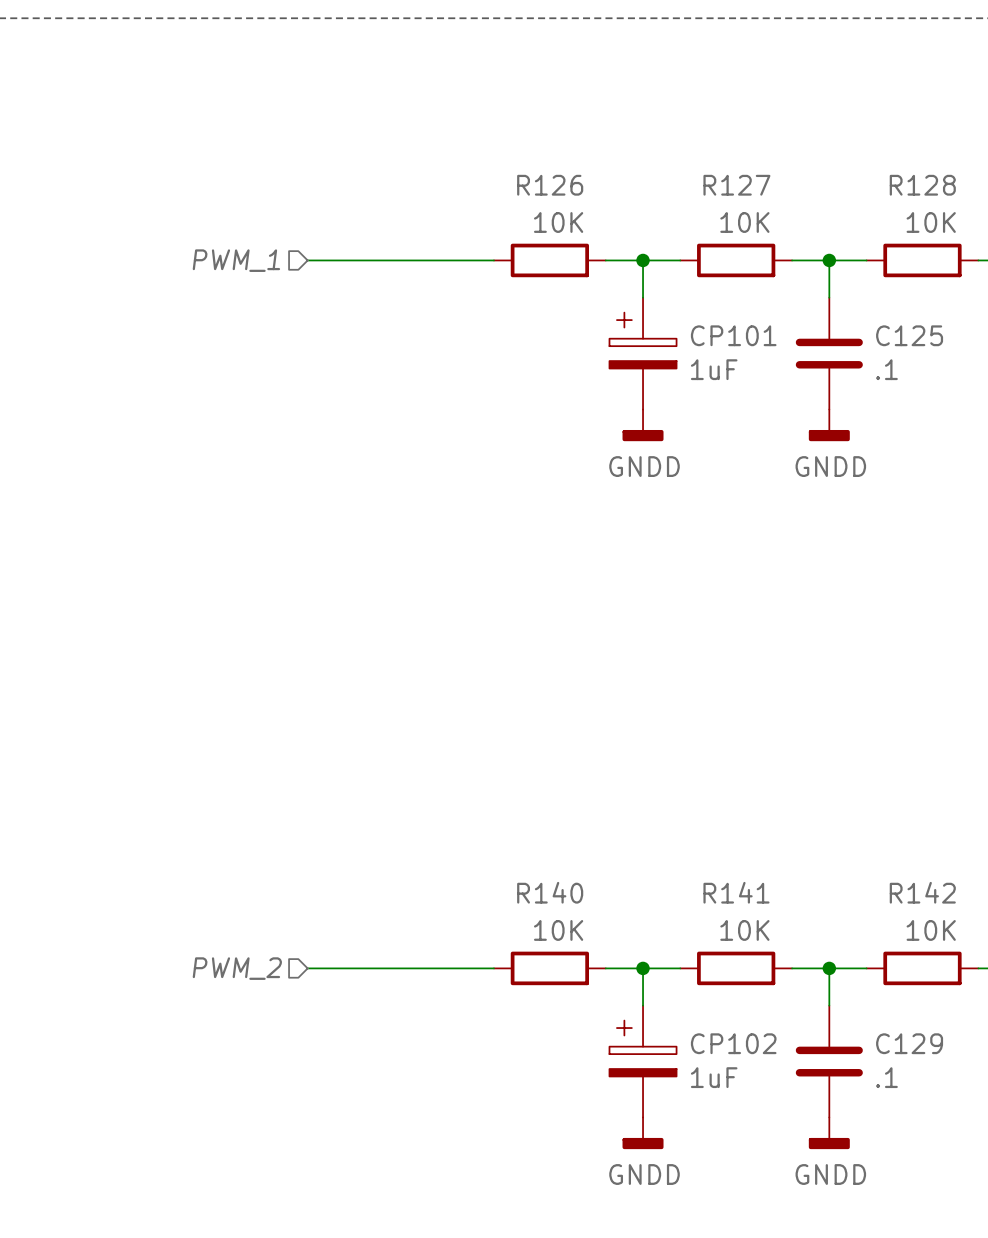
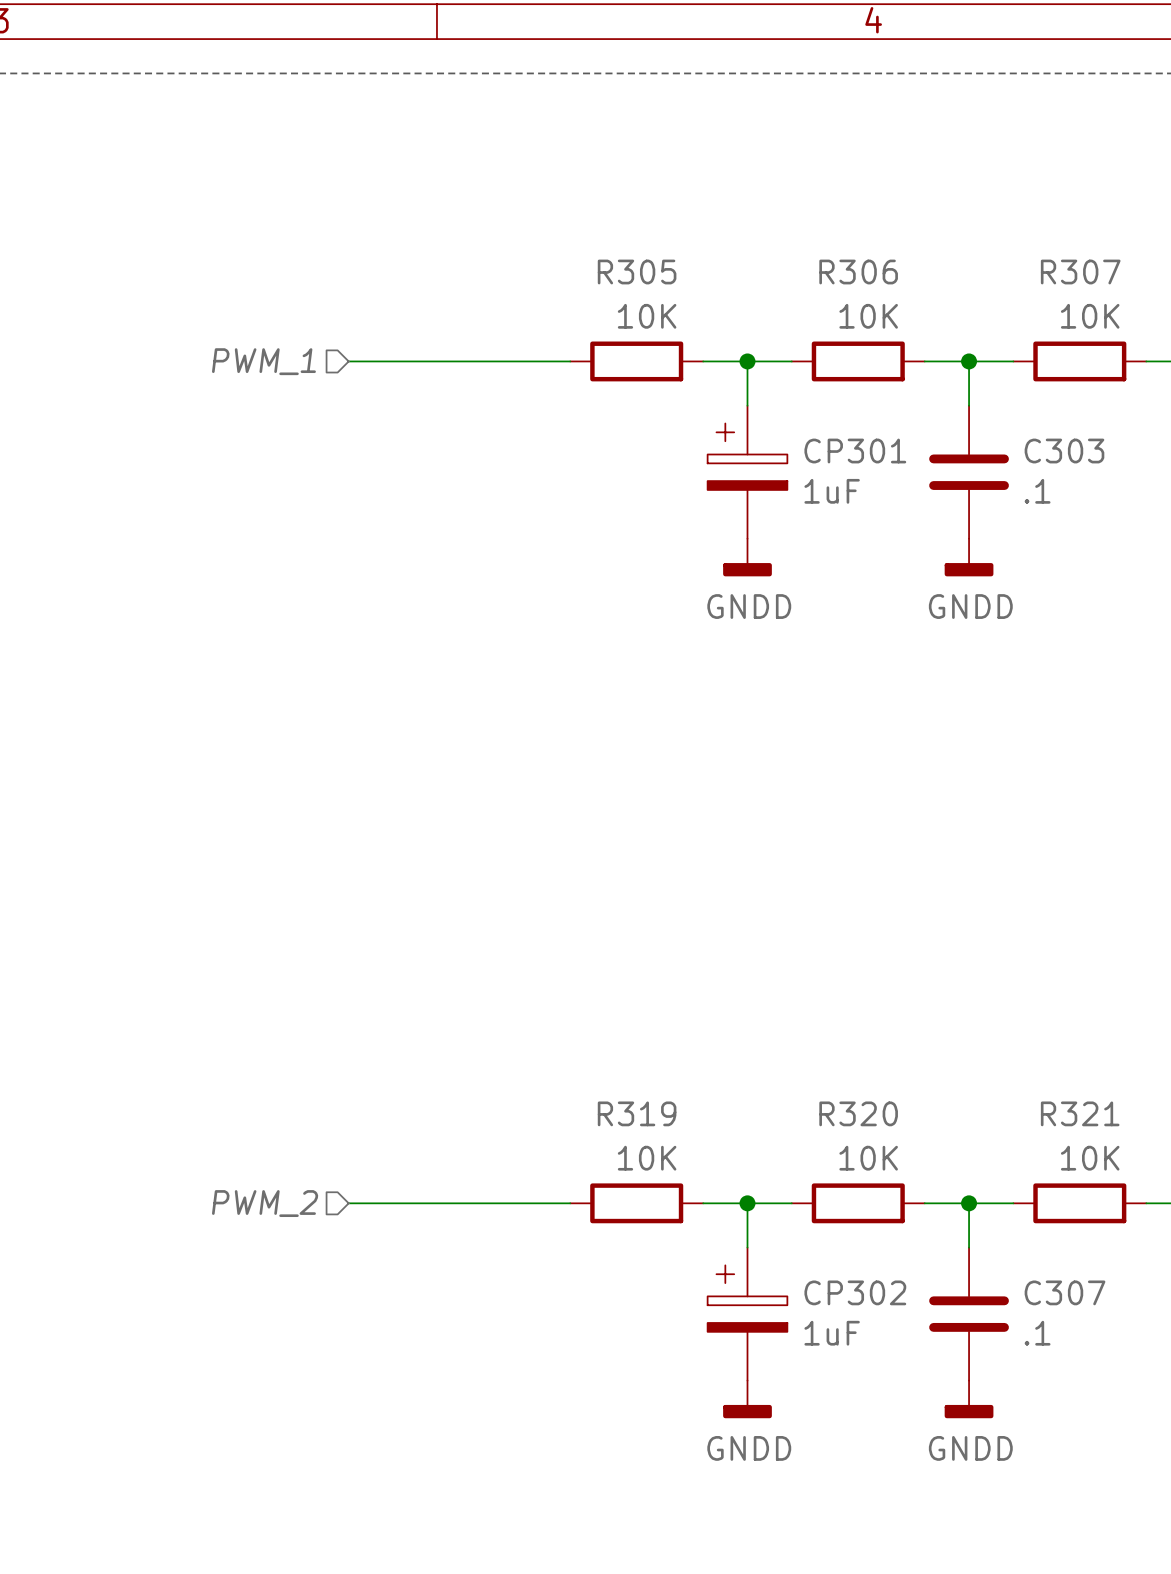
R126 name: R126 (550, 185) -> R305 (637, 272)
R127 name: R127 (736, 185) -> R306 (858, 272)
R128 name: R128 (922, 185) -> R307 (1080, 272)
CP101 name: CP101 (733, 335) -> CP301 (855, 451)
C125 name: C125 (909, 335) -> C303 (1064, 451)
R140 name: R140 (550, 892) -> R319 (637, 1113)
R141 name: R141 (736, 892) -> R320 (858, 1113)
R142 name: R142 (922, 892) -> R321 (1080, 1113)
CP102 name: CP102 (733, 1043) -> CP302 (855, 1292)
C129 name: C129 (909, 1043) -> C307 (1065, 1292)

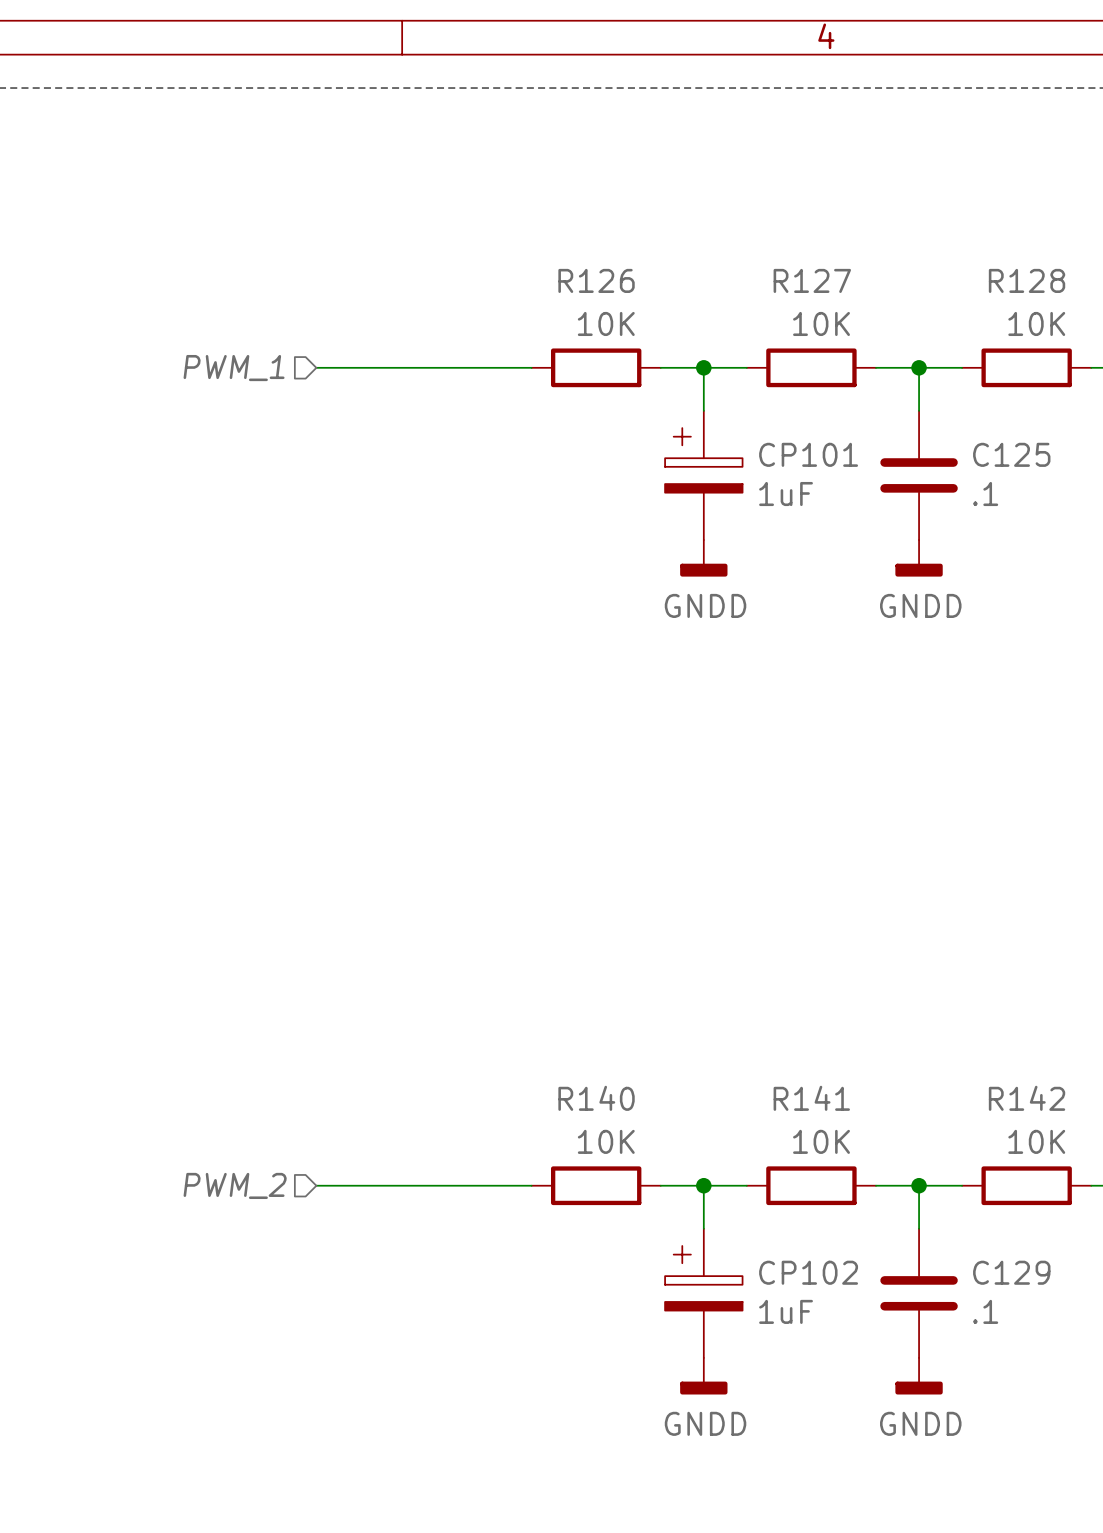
R305 name: R305 (637, 272) -> R126 (596, 280)
R306 name: R306 (858, 272) -> R127 (812, 280)
R307 name: R307 (1080, 272) -> R128 (1027, 280)
CP301 name: CP301 (855, 451) -> CP101 (808, 454)
C303 name: C303 (1064, 451) -> C125 (1011, 454)
R319 name: R319 (637, 1113) -> R140 (596, 1098)
R320 name: R320 (858, 1113) -> R141 (811, 1098)
R321 name: R321 (1080, 1113) -> R142 (1027, 1098)
CP302 name: CP302 (855, 1292) -> CP102 (808, 1272)
C307 name: C307 (1065, 1292) -> C129 (1011, 1272)

